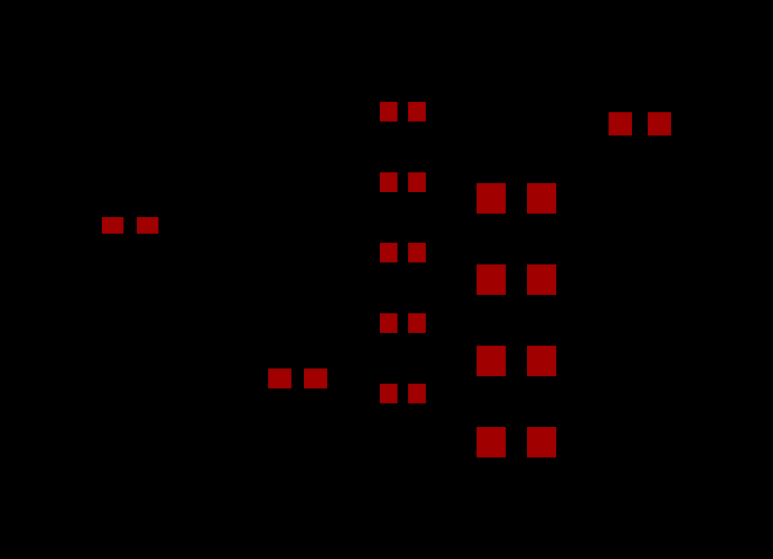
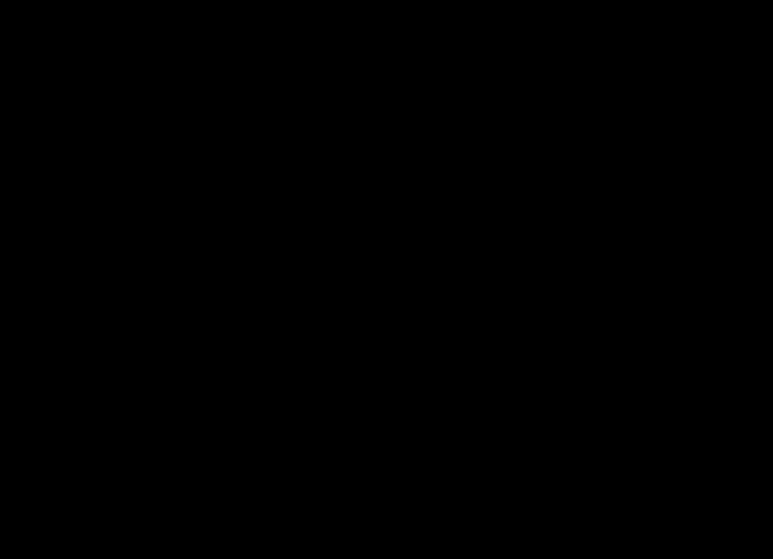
part: (402, 111) -> none
part: (639, 123) -> none
part: (402, 182) -> none
part: (516, 198) -> none
part: (130, 225) -> none
part: (402, 252) -> none
part: (516, 279) -> none
part: (402, 323) -> none
part: (516, 360) -> none
part: (297, 378) -> none
part: (402, 393) -> none
part: (516, 442) -> none

